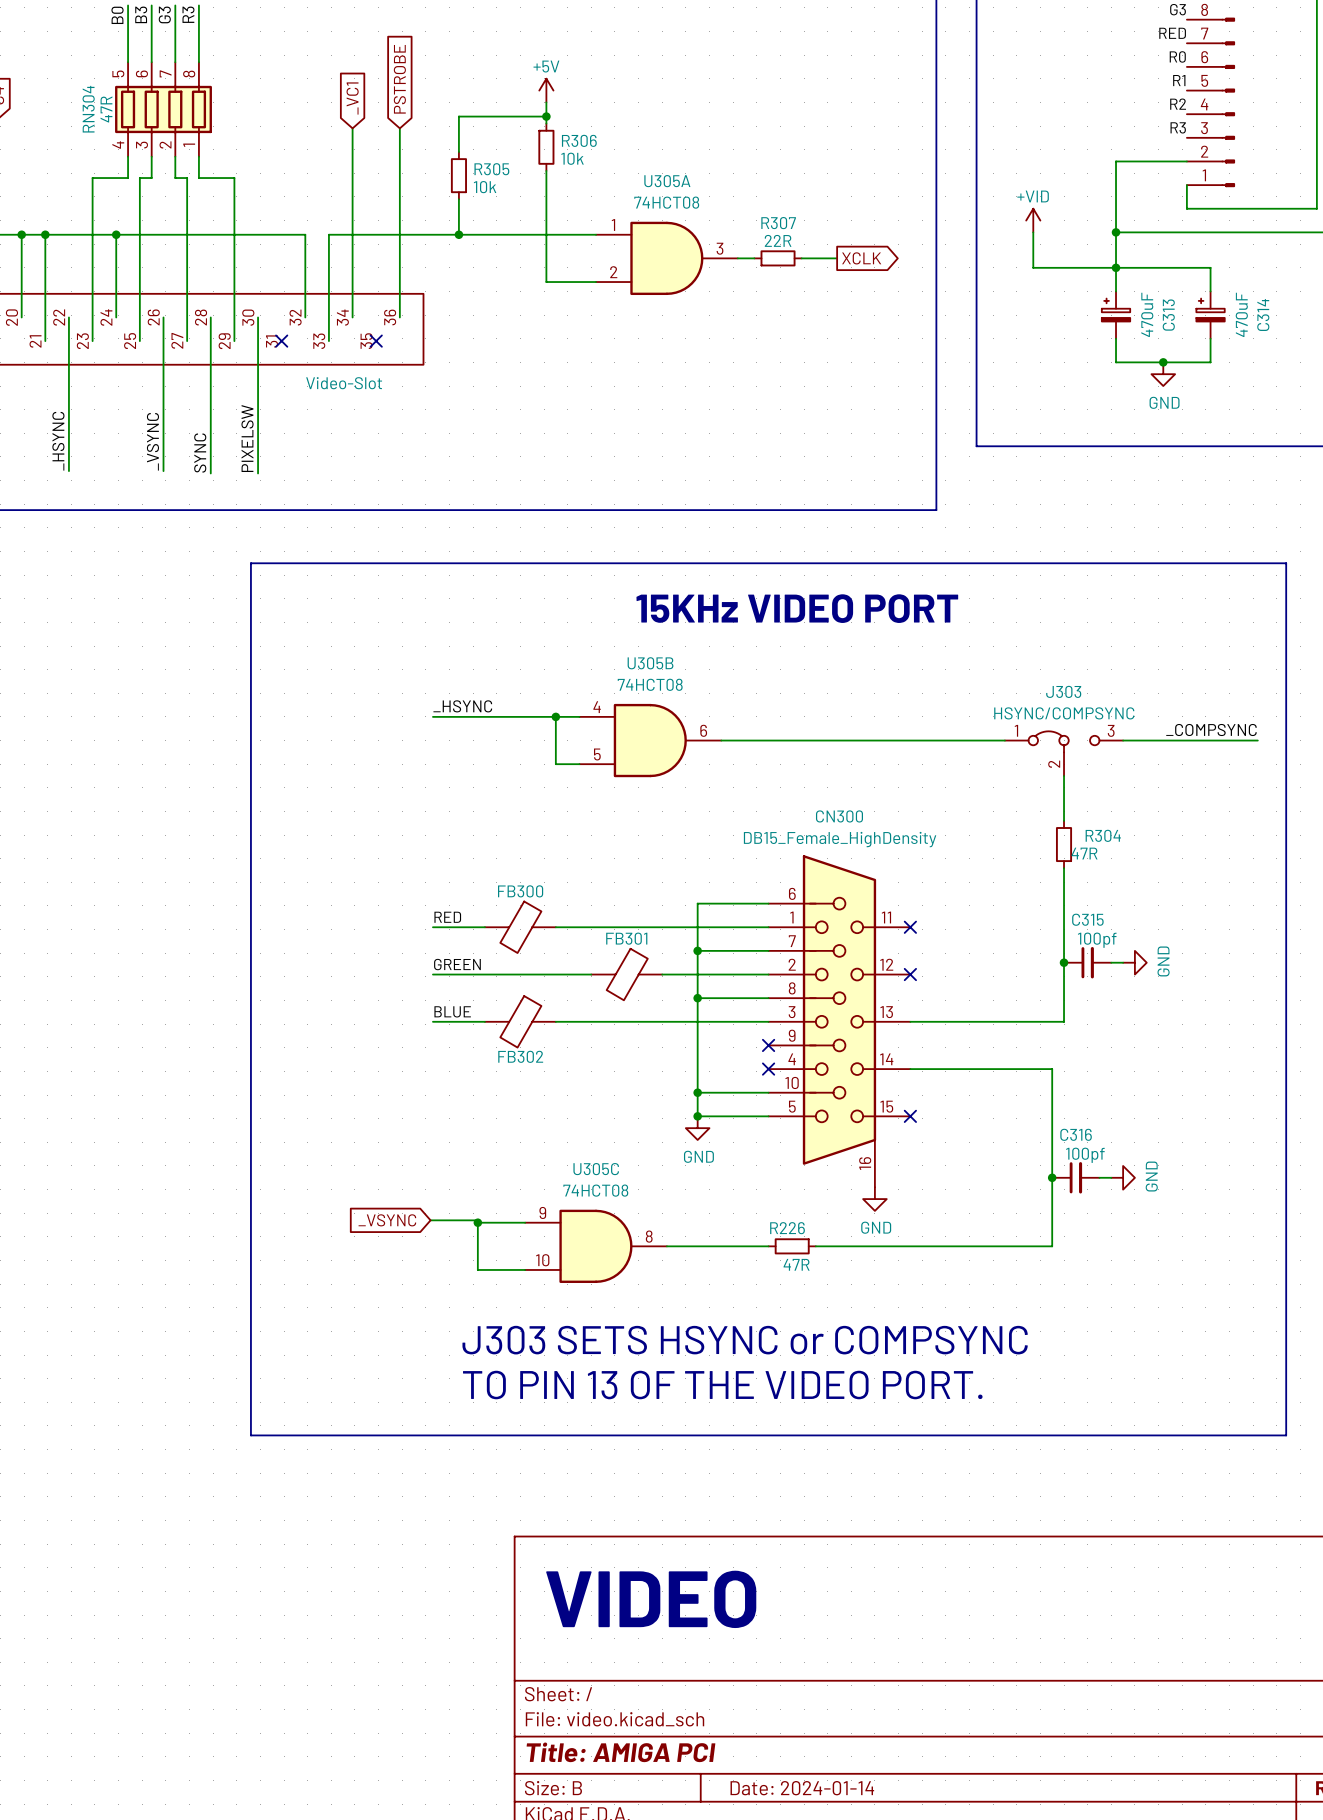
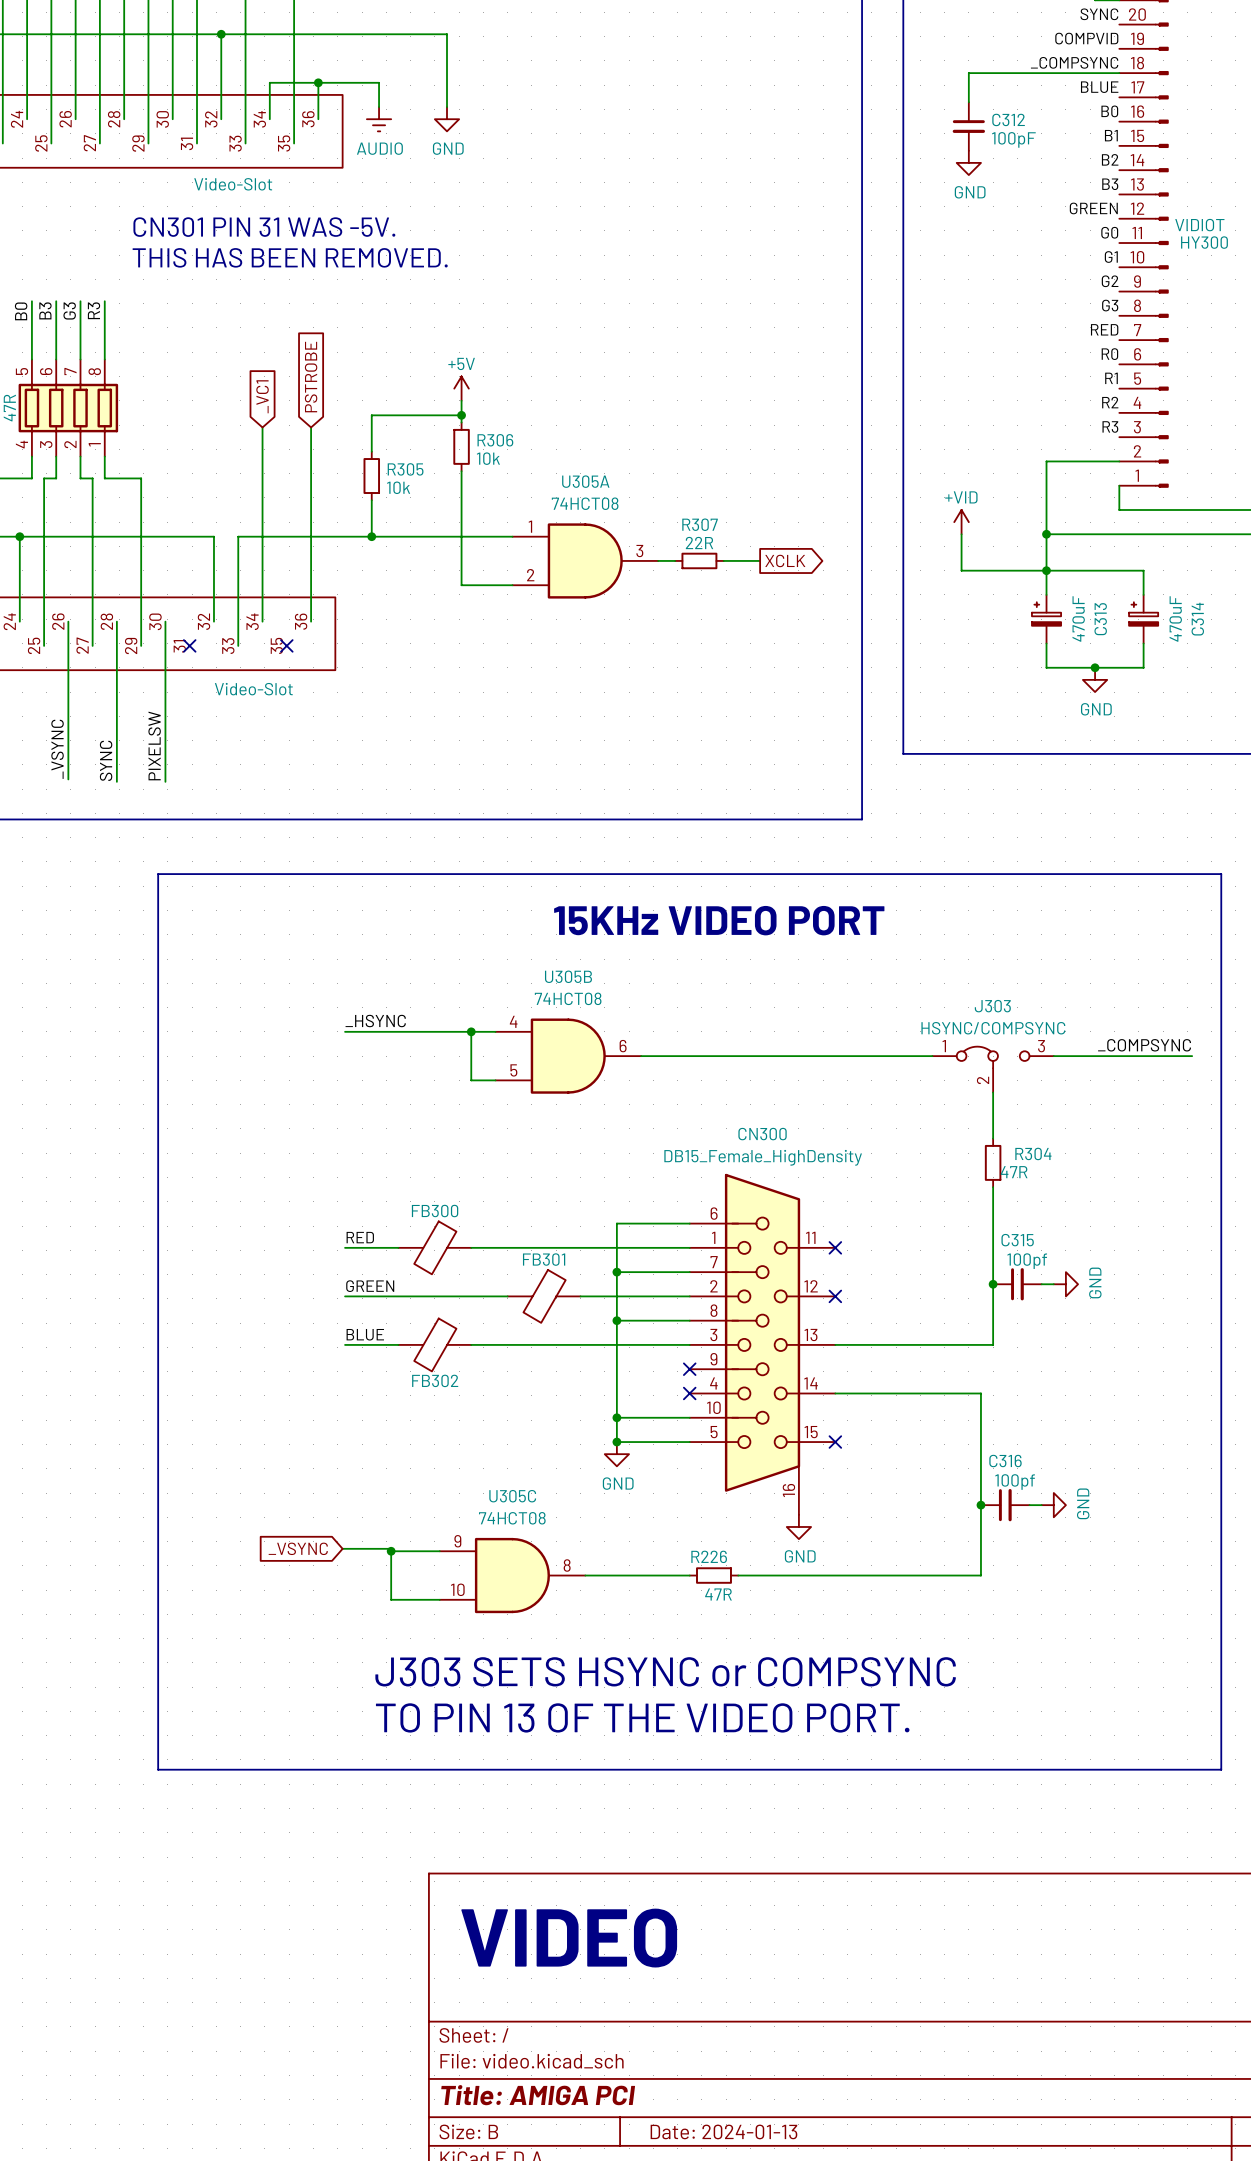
title block: Date: 2024-01-14 (802, 1788) -> Date: 2024-01-13 (723, 2131)

